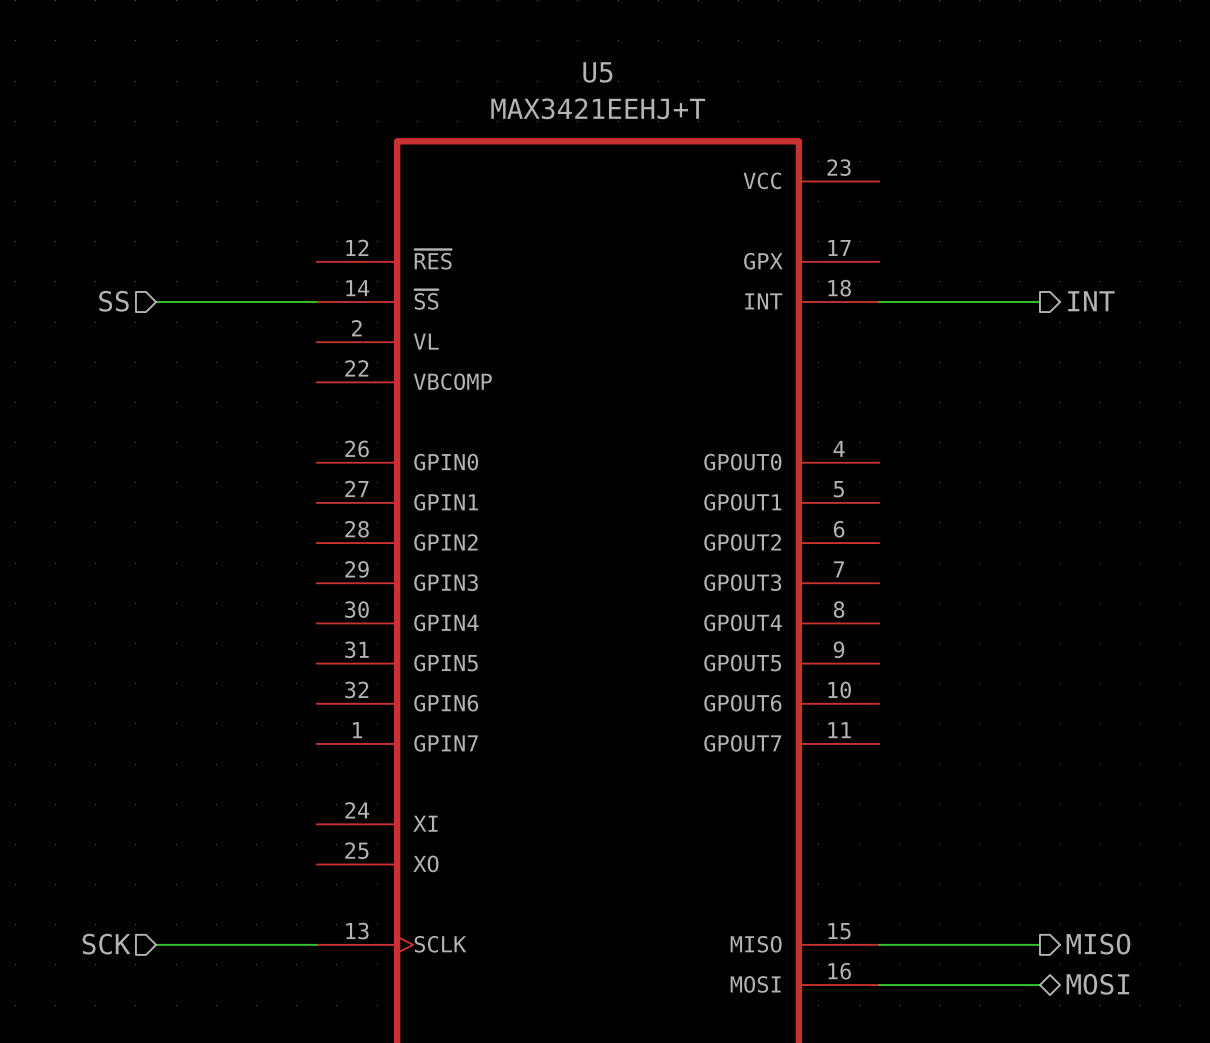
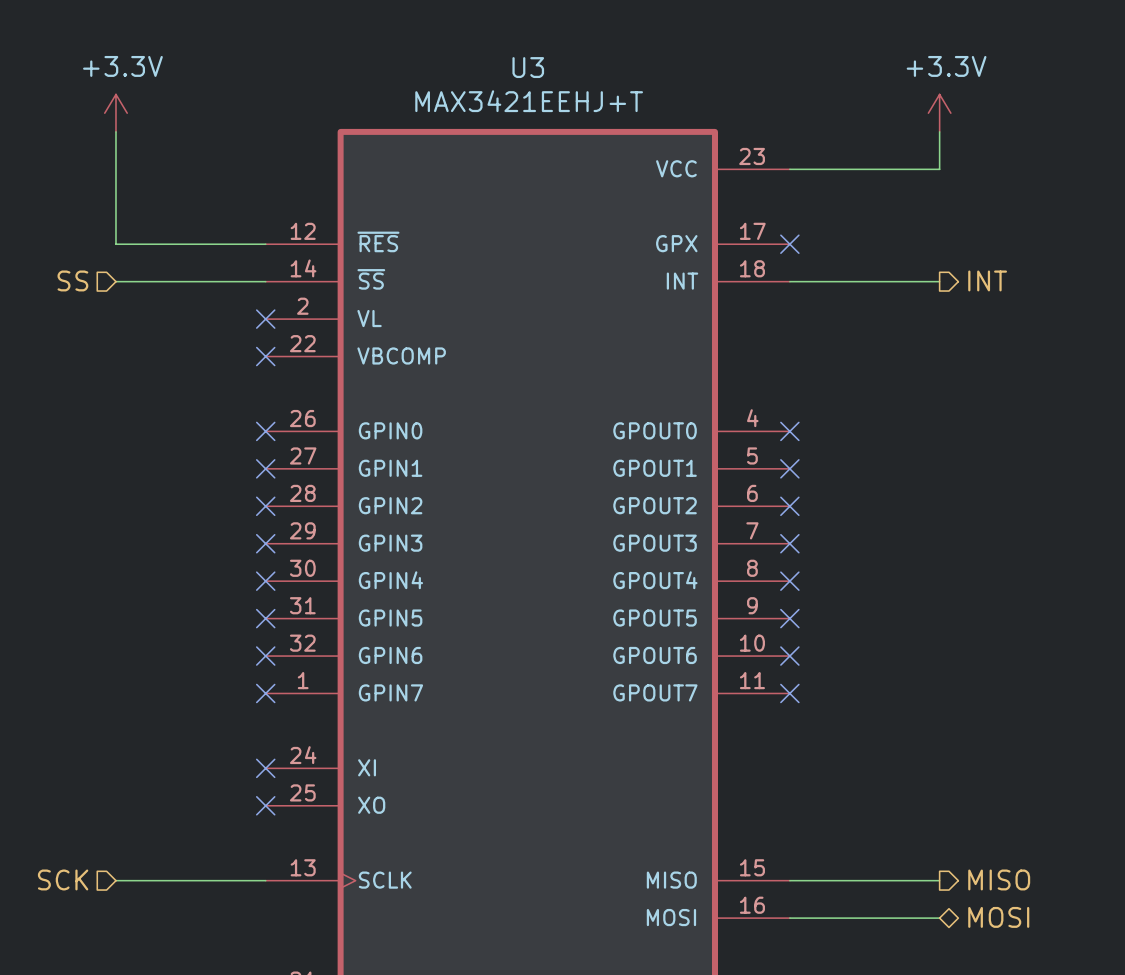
U5 name: U5 (597, 72) -> U3 (528, 67)
power symbol: none -> +3.3V (115, 113)
power symbol: none -> +3.3V (939, 113)
wire: none -> (115, 131) (115, 244) (265, 244)
wire: none -> (939, 131) (939, 169) (789, 169)
no-connect mark: none -> (789, 244)
no-connect mark: none -> (265, 319)
no-connect mark: none -> (265, 356)
no-connect mark: none -> (265, 431)
no-connect mark: none -> (789, 431)
no-connect mark: none -> (265, 468)
no-connect mark: none -> (789, 468)
no-connect mark: none -> (265, 506)
no-connect mark: none -> (789, 506)
no-connect mark: none -> (265, 543)
no-connect mark: none -> (789, 543)
no-connect mark: none -> (265, 581)
no-connect mark: none -> (789, 581)
no-connect mark: none -> (265, 618)
no-connect mark: none -> (789, 618)
no-connect mark: none -> (265, 656)
no-connect mark: none -> (789, 656)
no-connect mark: none -> (265, 693)
no-connect mark: none -> (789, 693)
no-connect mark: none -> (265, 768)
no-connect mark: none -> (265, 805)

